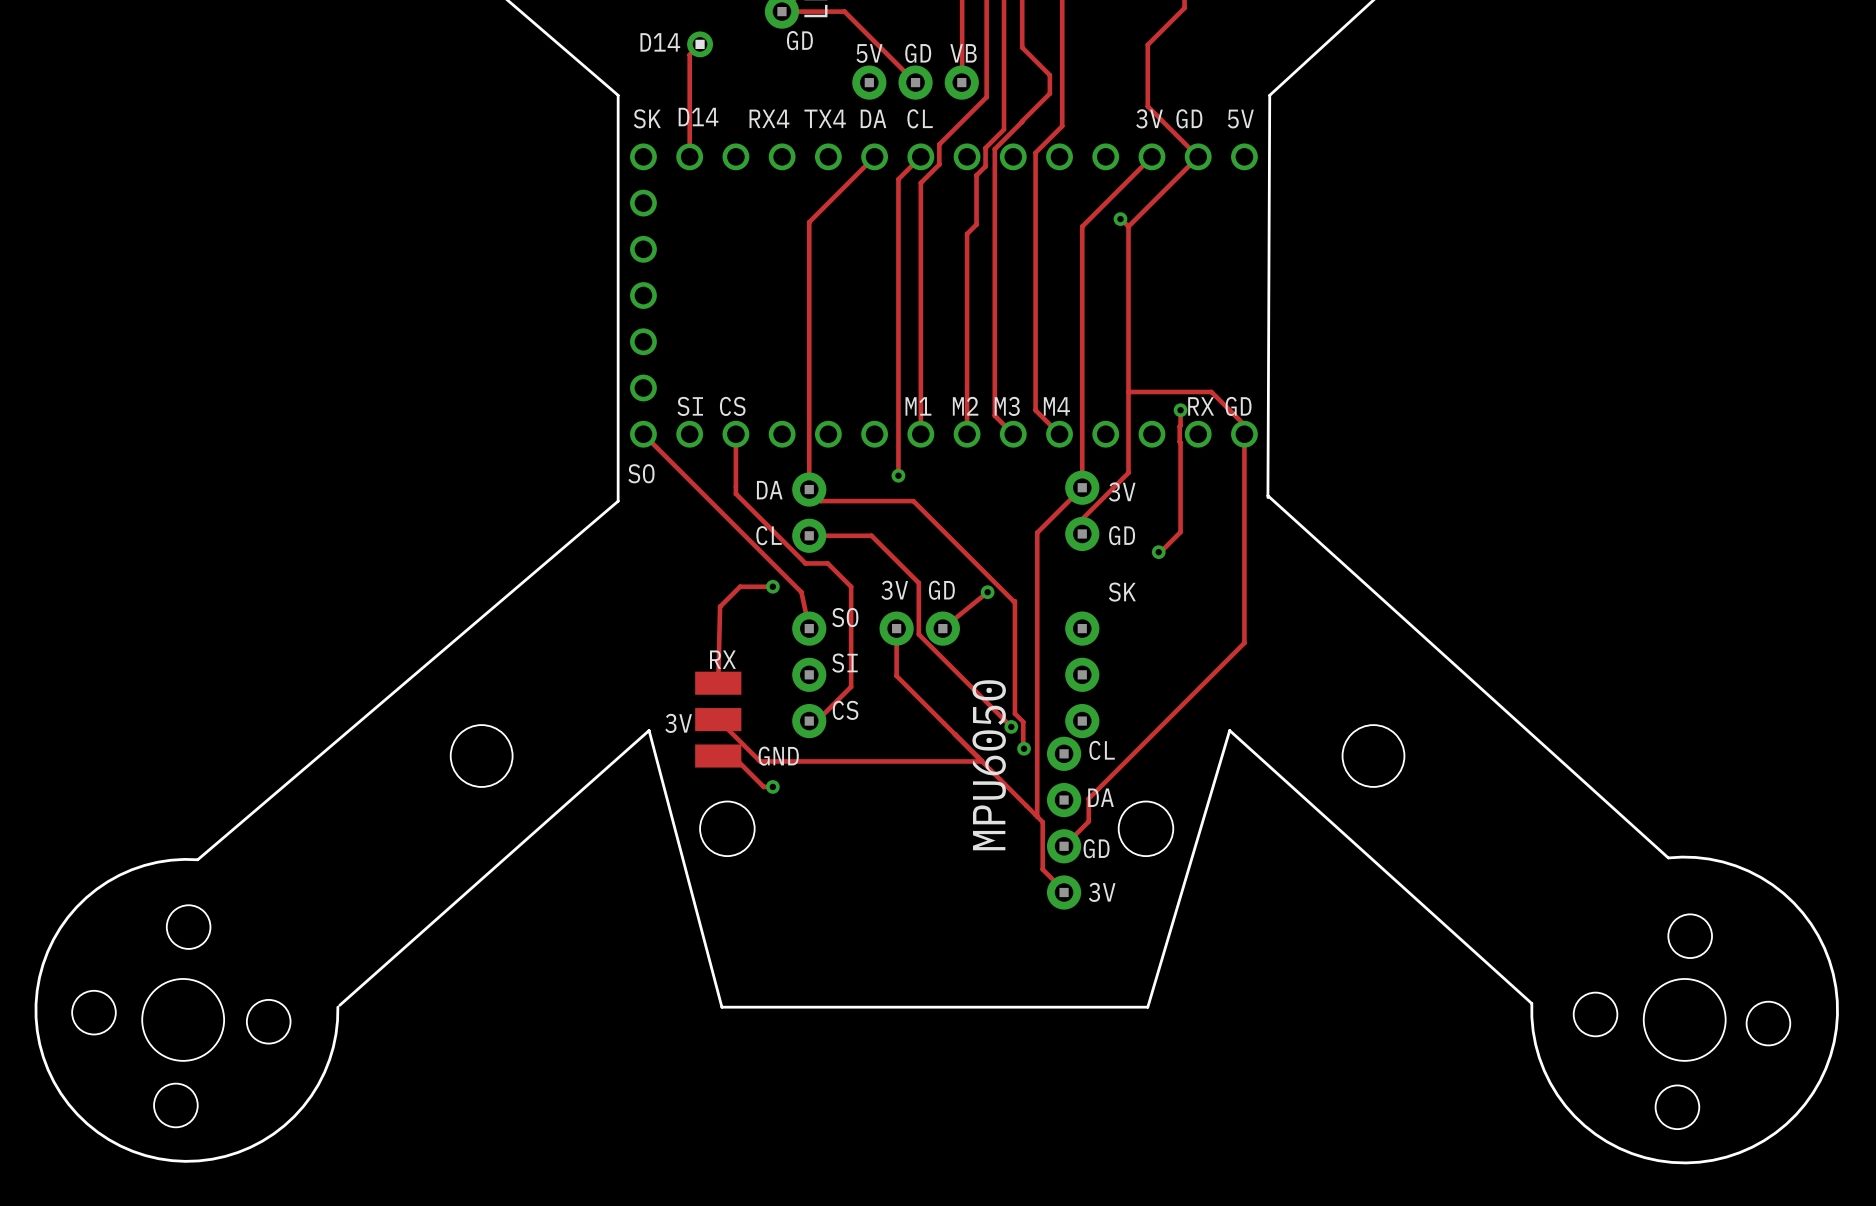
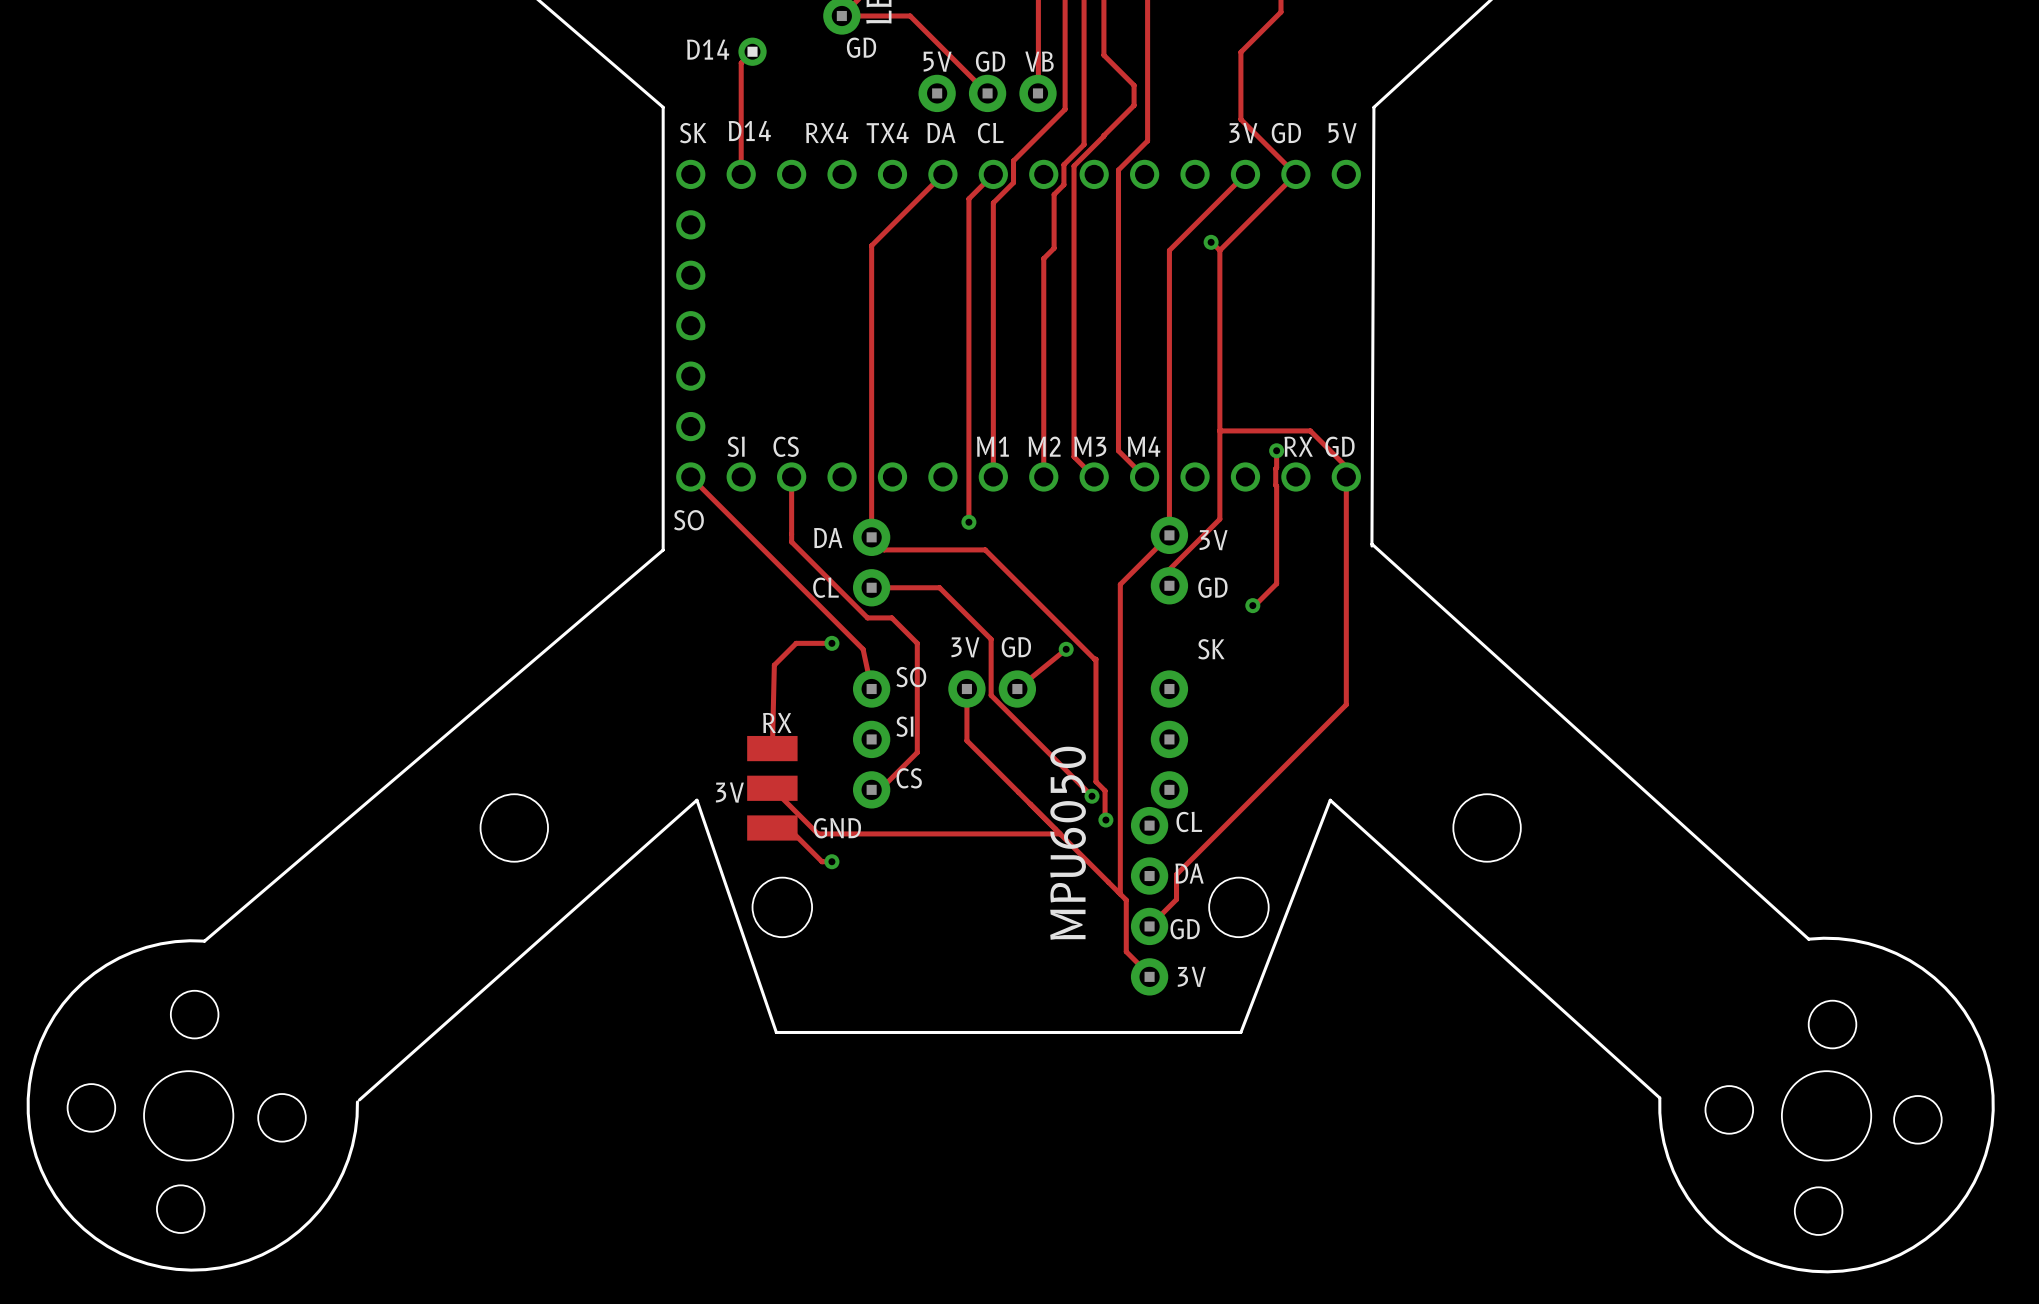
board edge: (649, 730) (721, 1007) (1147, 1007) (1229, 730) -> (696, 800) (776, 1032) (1240, 1032) (1330, 800)

